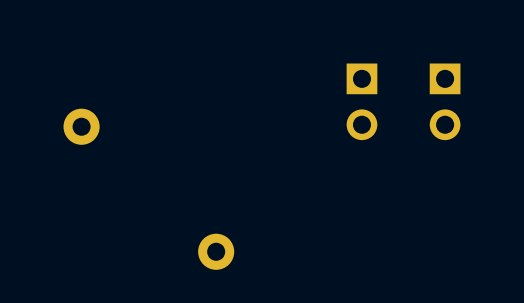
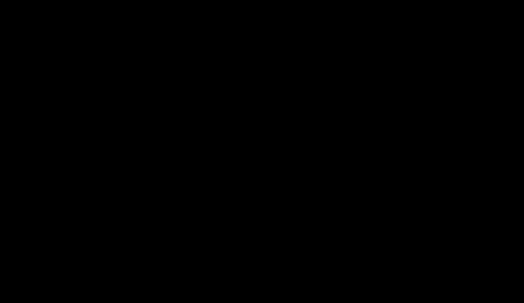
part: (361, 101) -> none
part: (445, 101) -> none
part: (81, 126) -> none
part: (216, 251) -> none

